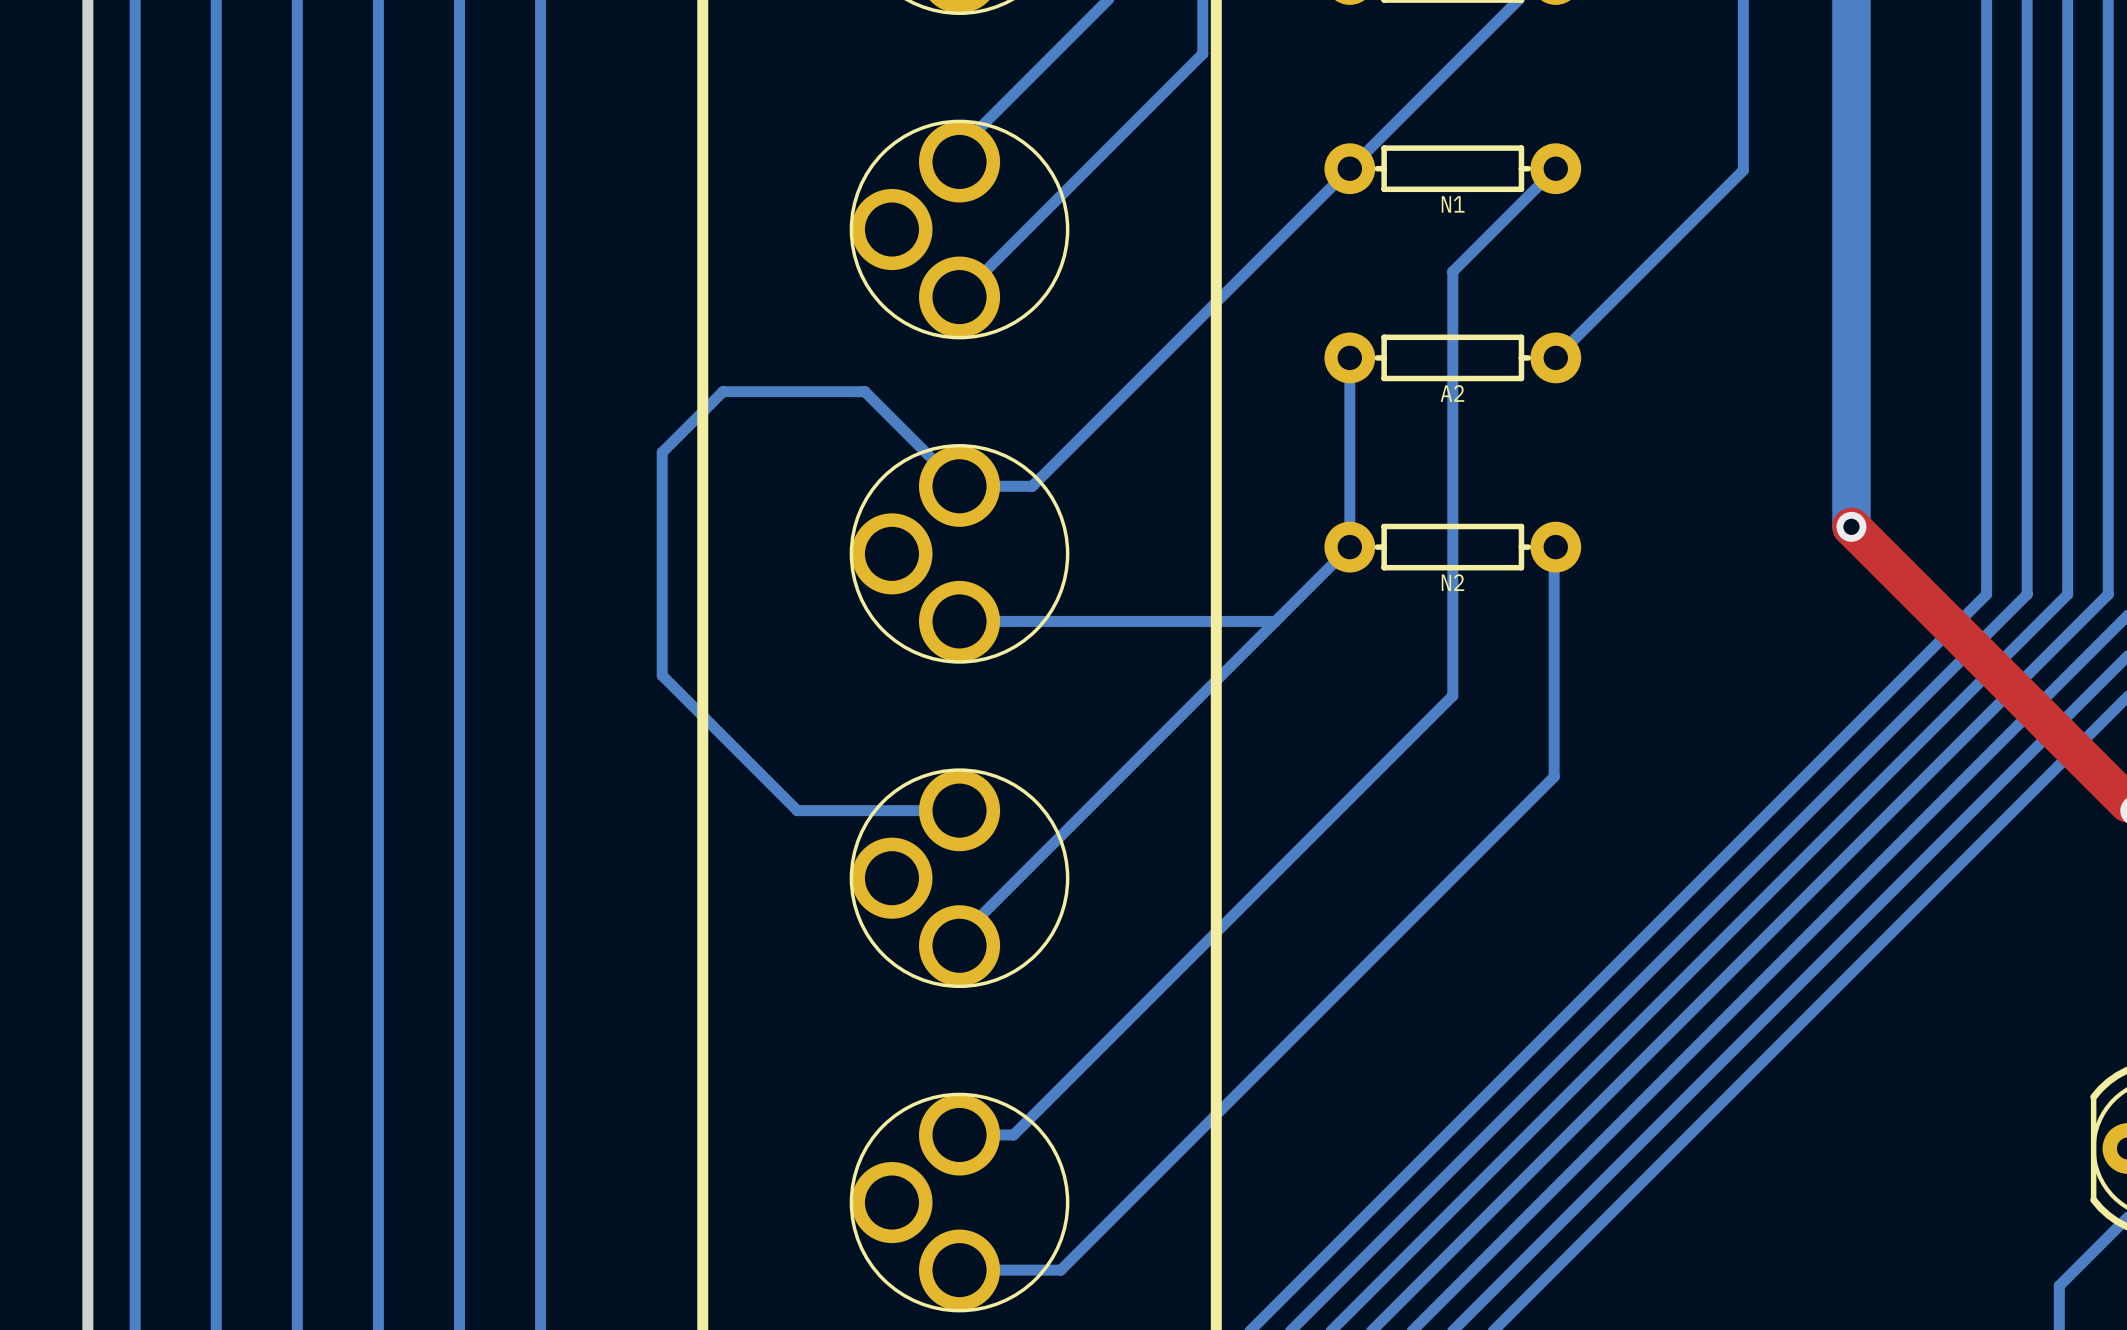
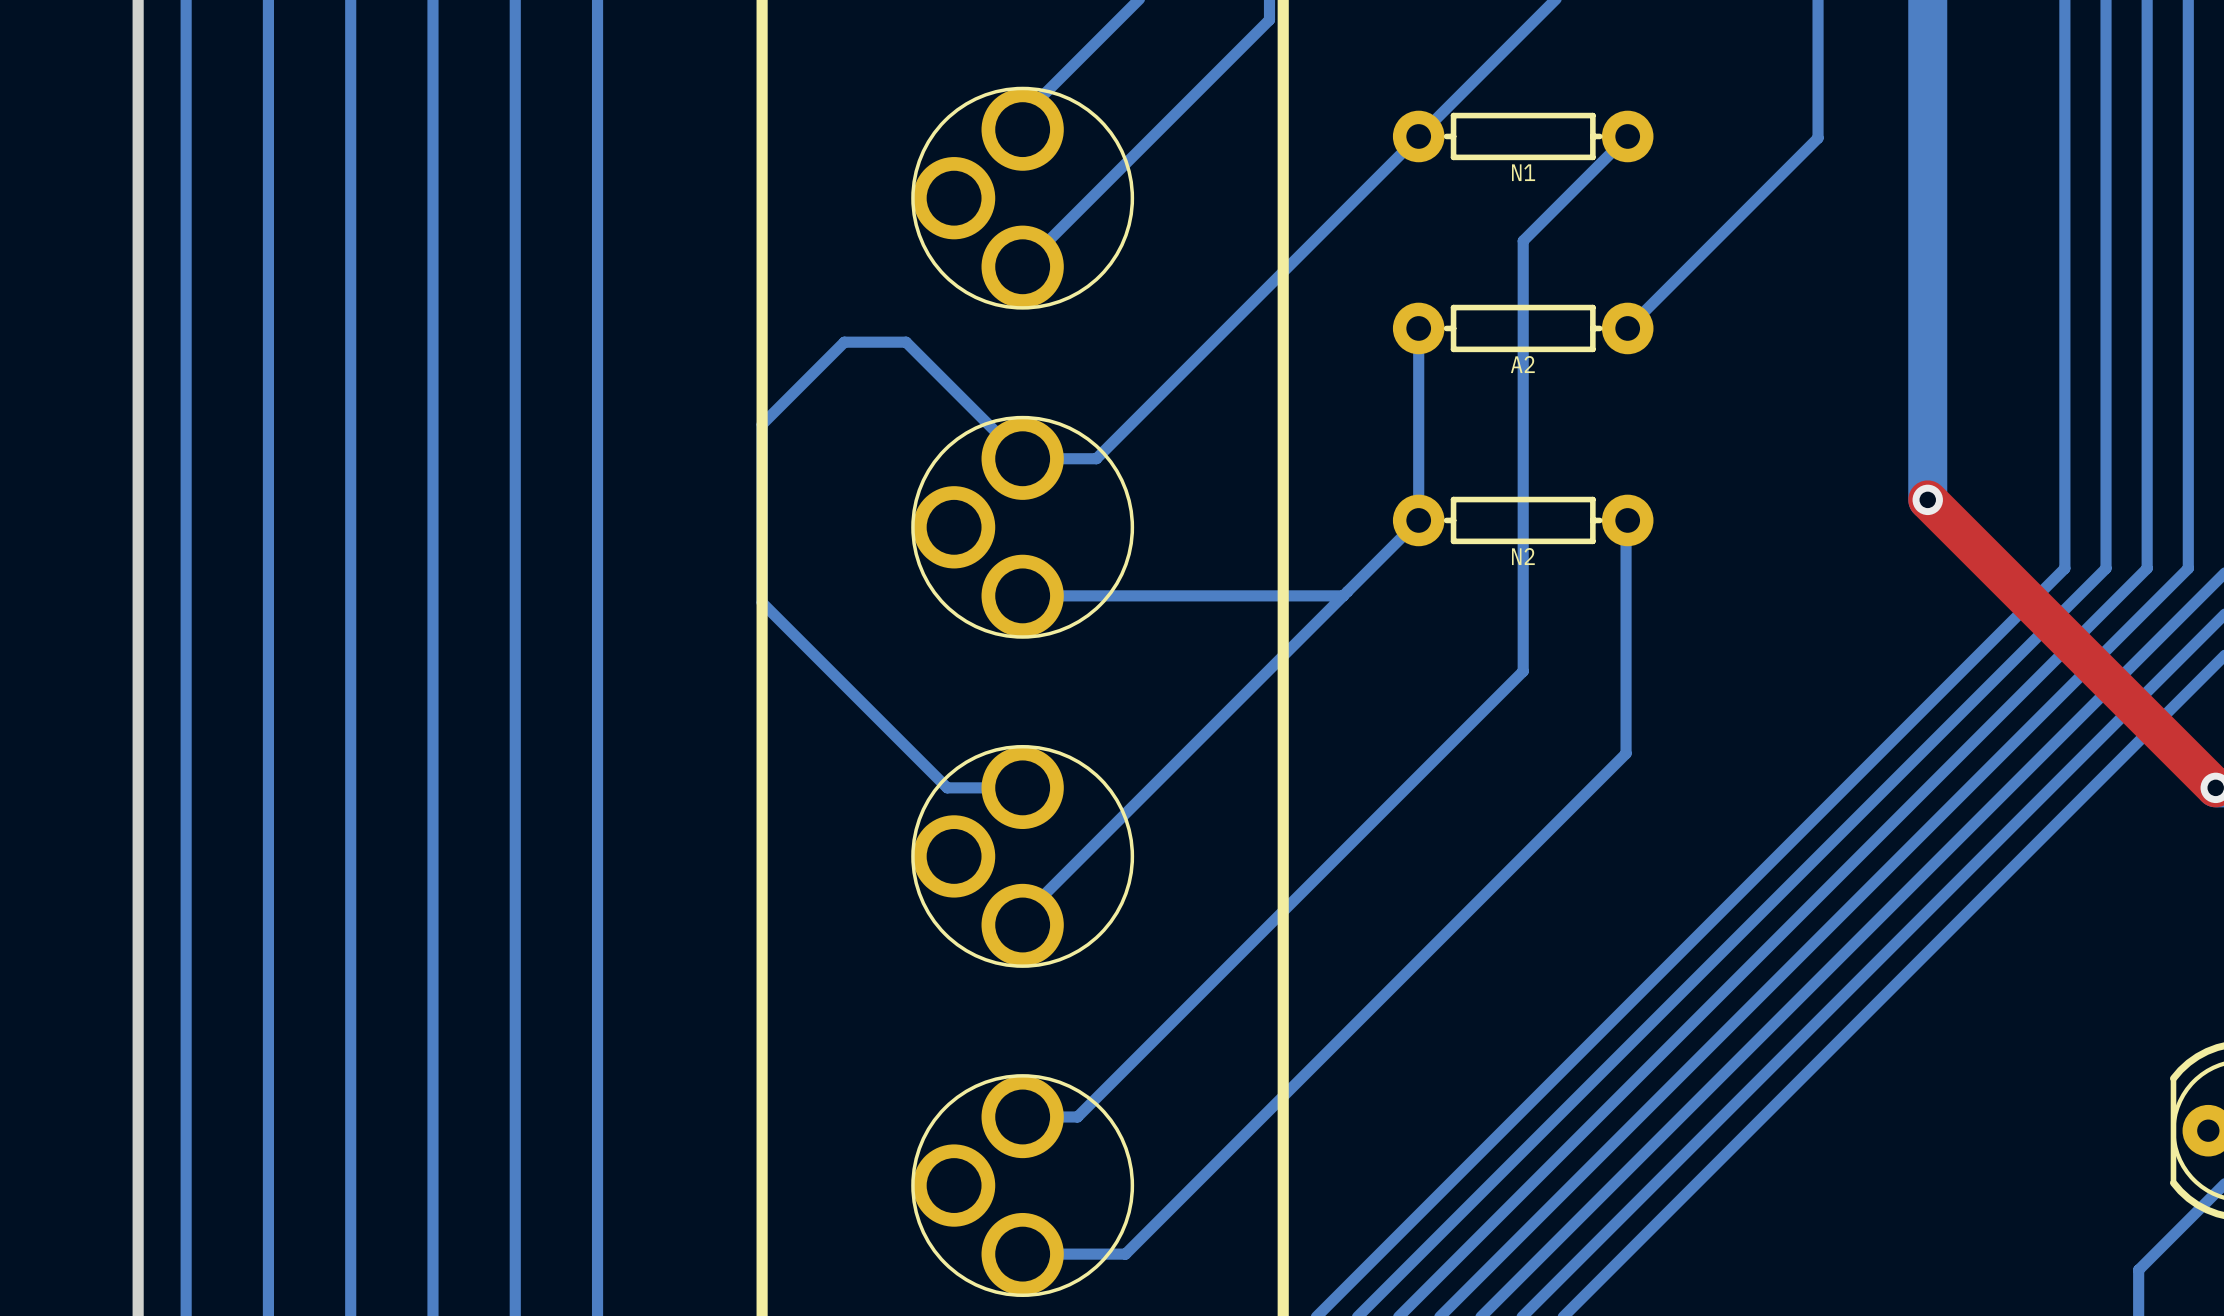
bottom track: (864, 391) (723, 391) (662, 452) (662, 675) (797, 810) (885, 810) -> (926, 362) (906, 342) (844, 342) (762, 424) (762, 602) (947, 787)

